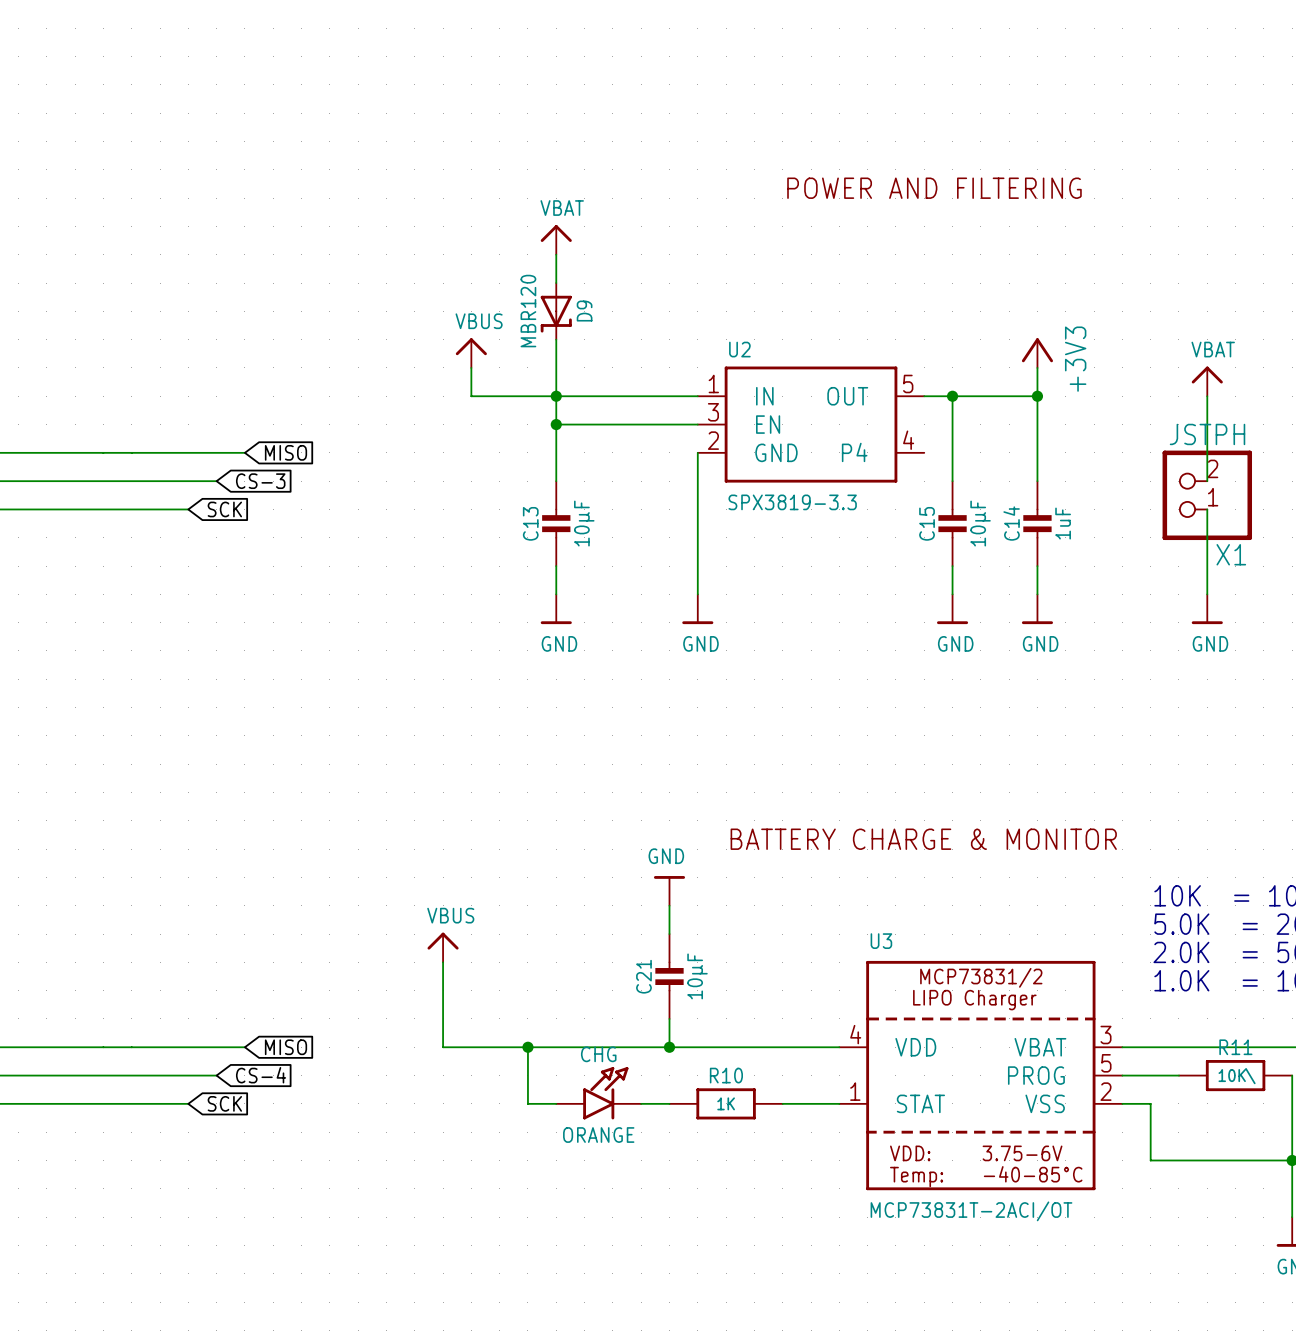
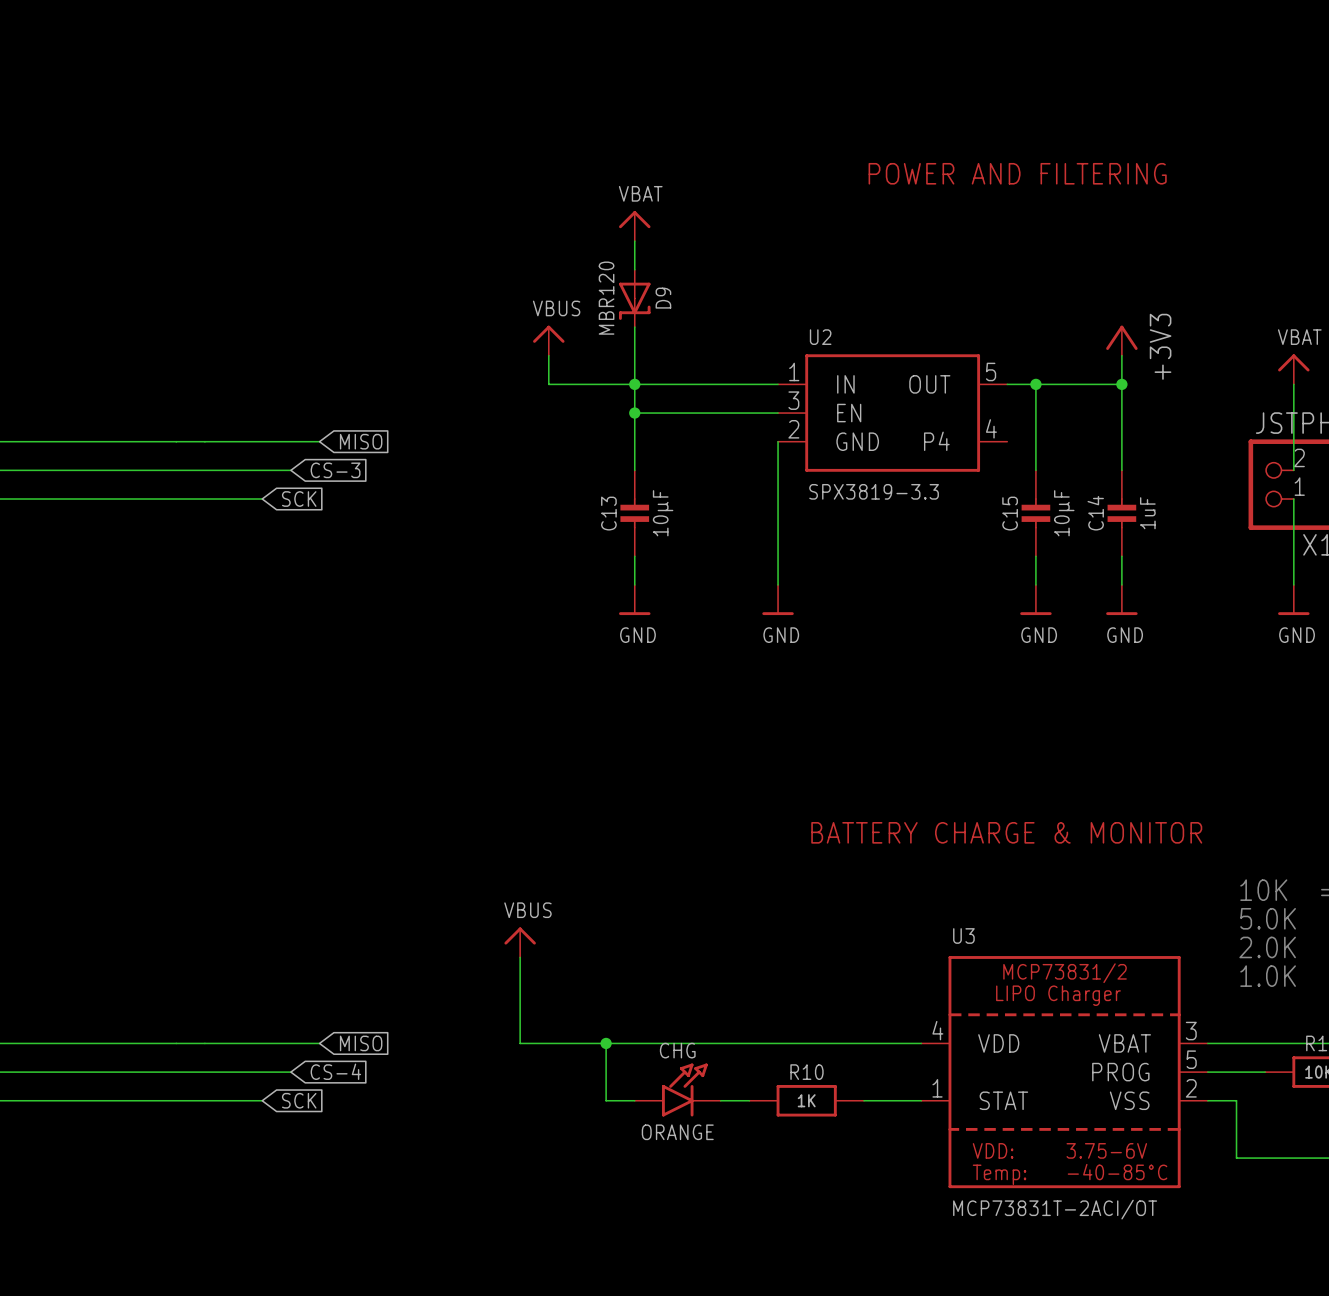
power symbol: GND (669, 890) -> none
wire: (669, 905) (669, 934) -> none
C21: 10µF (669, 976) -> none
wire: (669, 1018) (669, 1047) -> none
junction: (669, 1047) -> none

